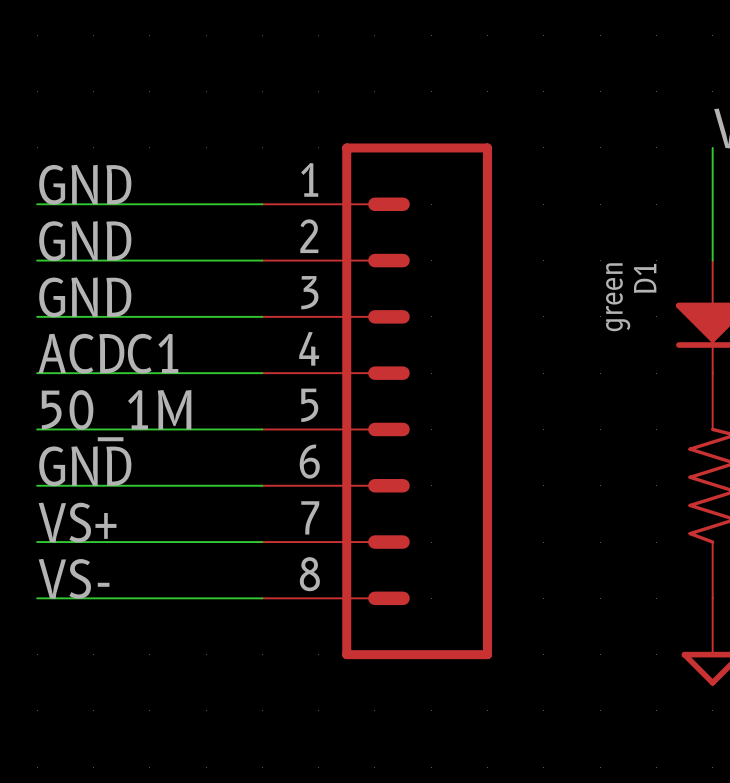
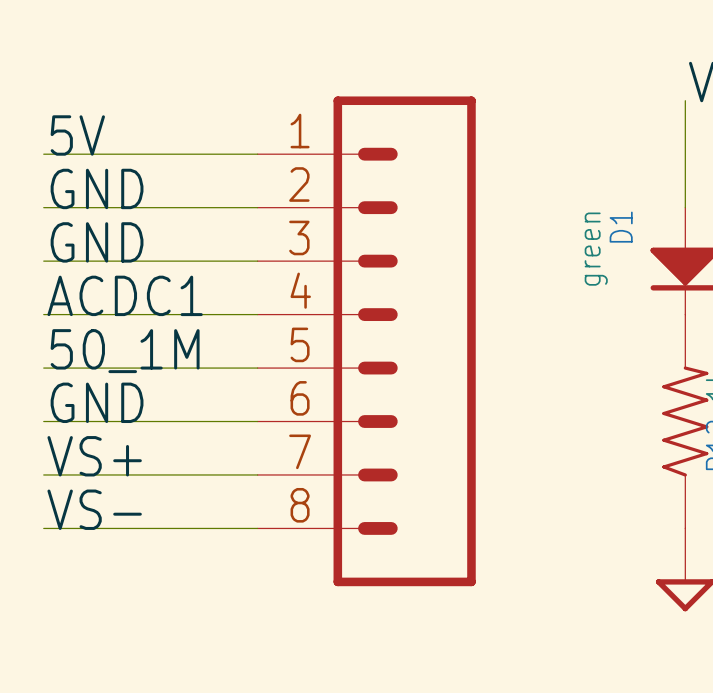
label: GND (85, 184) -> 5V (77, 135)

